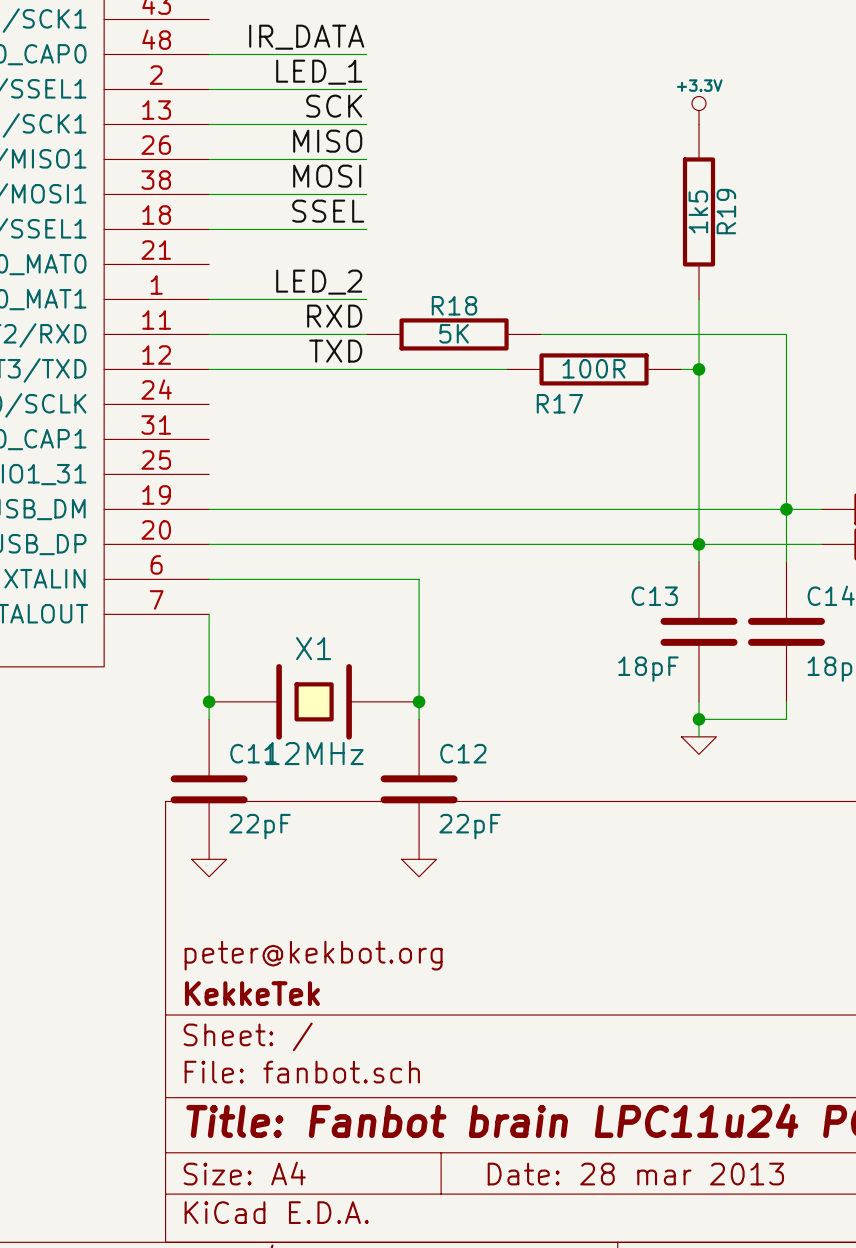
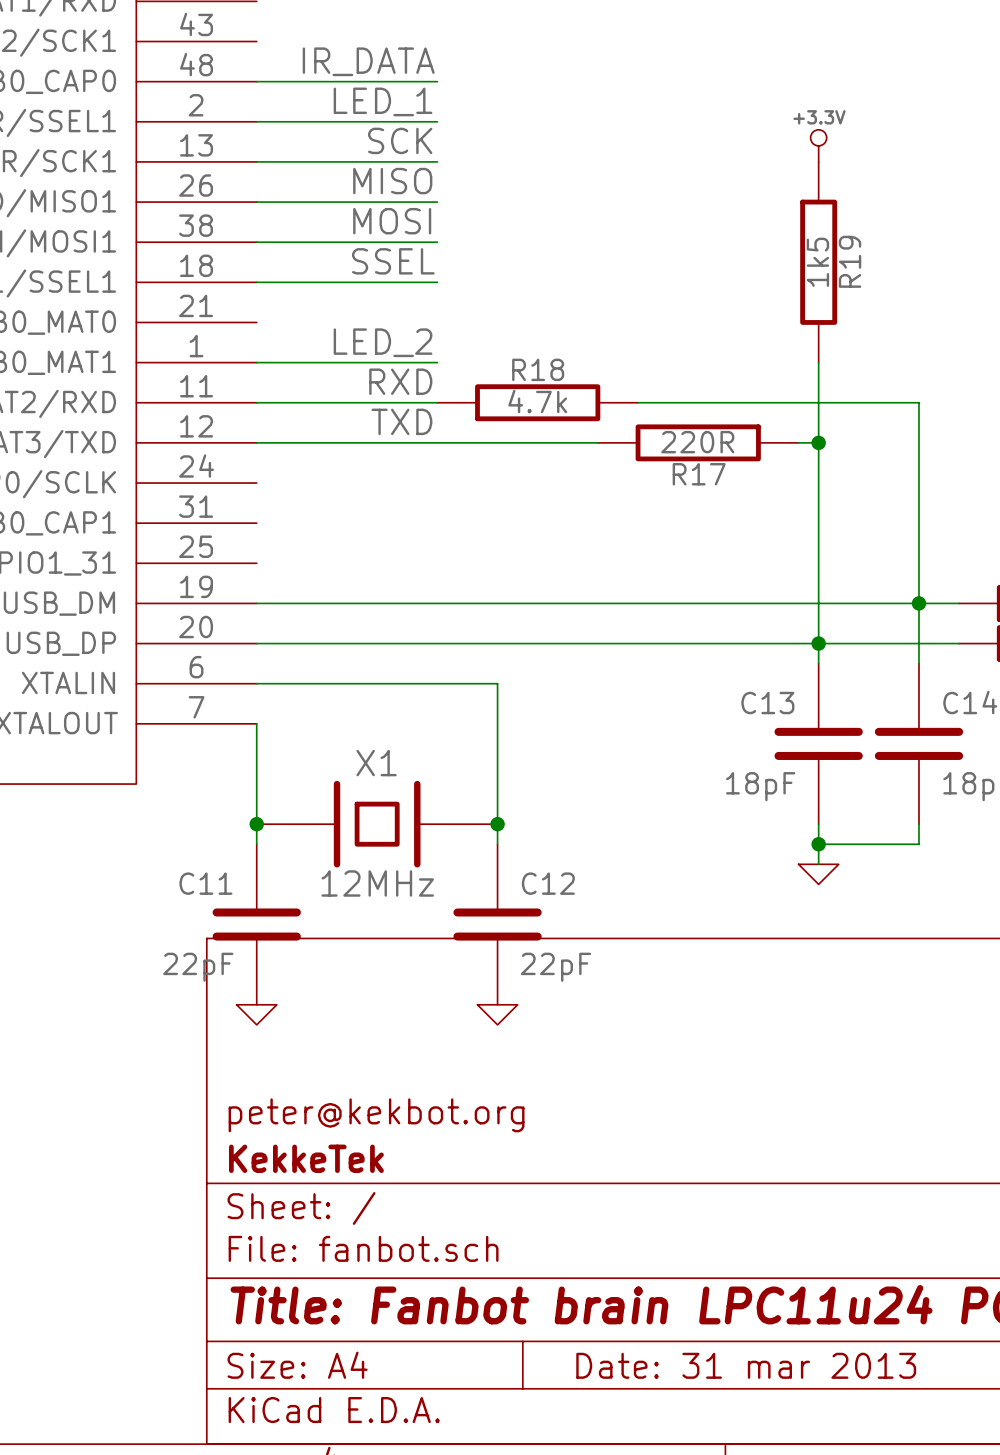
R18 value: 5K (454, 333) -> 4.7k (537, 401)
R17 value: 100R (594, 368) -> 220R (697, 442)
R17 name position: R17 (559, 403) -> R17 (699, 474)
C11 name position: C11 (253, 753) -> C11 (205, 883)
C11 value position: 22pF (260, 826) -> 22pF (198, 967)
title block: Date: 28 mar 2013 (635, 1174) -> Date: 31 mar 2013 (746, 1365)

